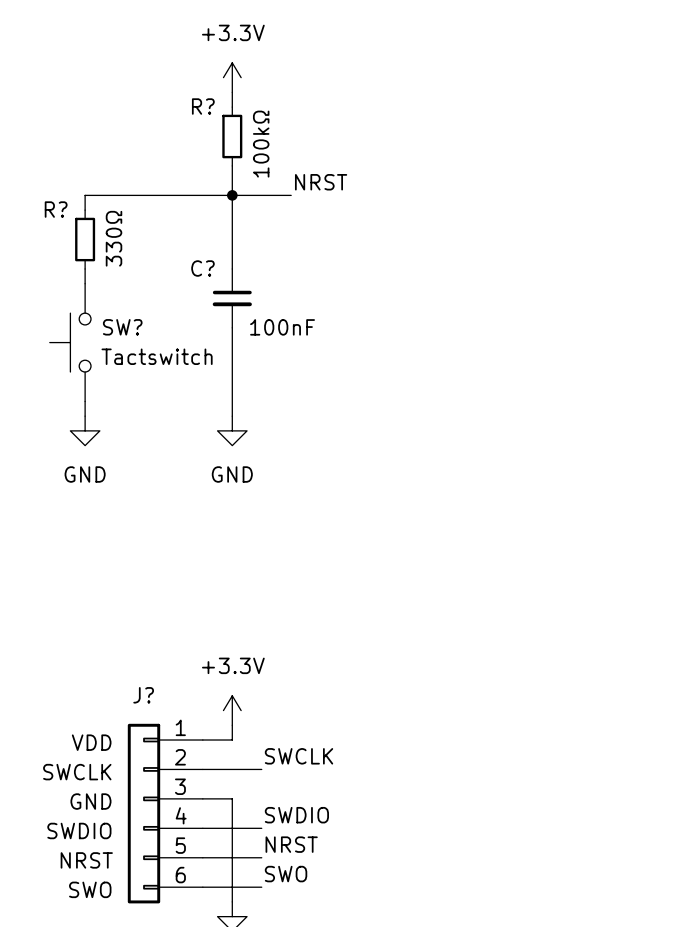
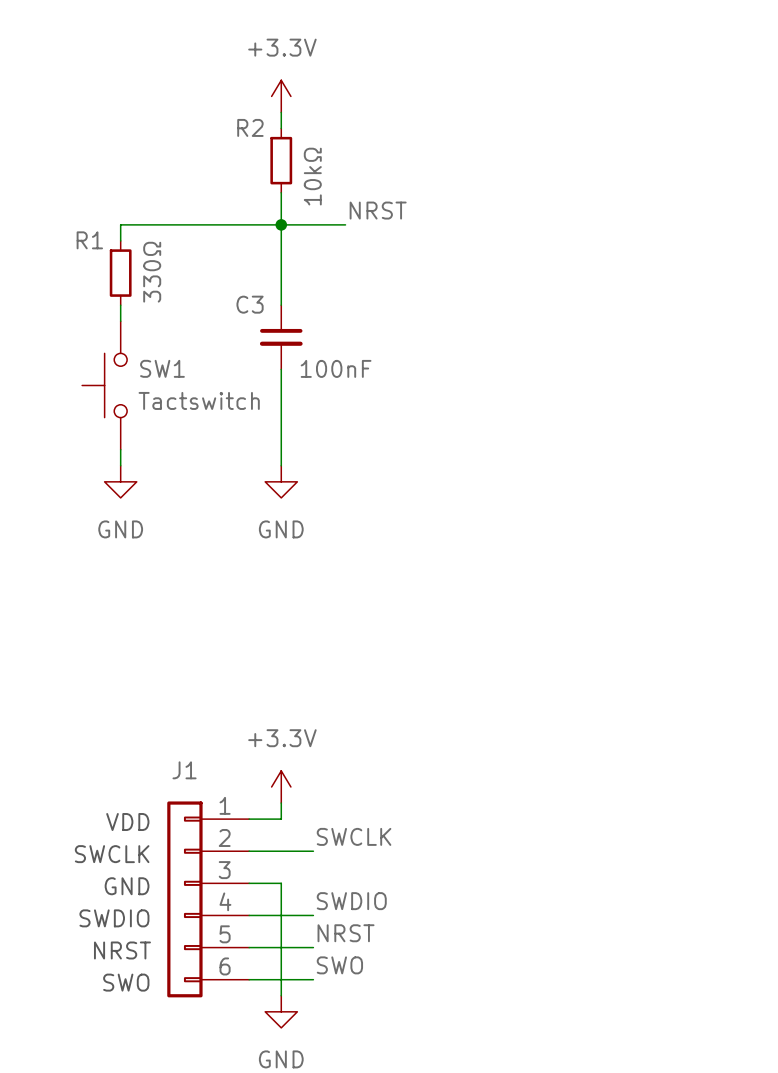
R? name: R? (203, 106) -> R2 (250, 127)
R? value: 100kΩ (261, 144) -> 10kΩ (312, 176)
R? name: R? (56, 209) -> R1 (89, 240)
C? name: C? (202, 268) -> C3 (250, 304)
SW? name: SW? (122, 327) -> SW1 (162, 368)
J? name: J? (143, 695) -> J1 (184, 770)

